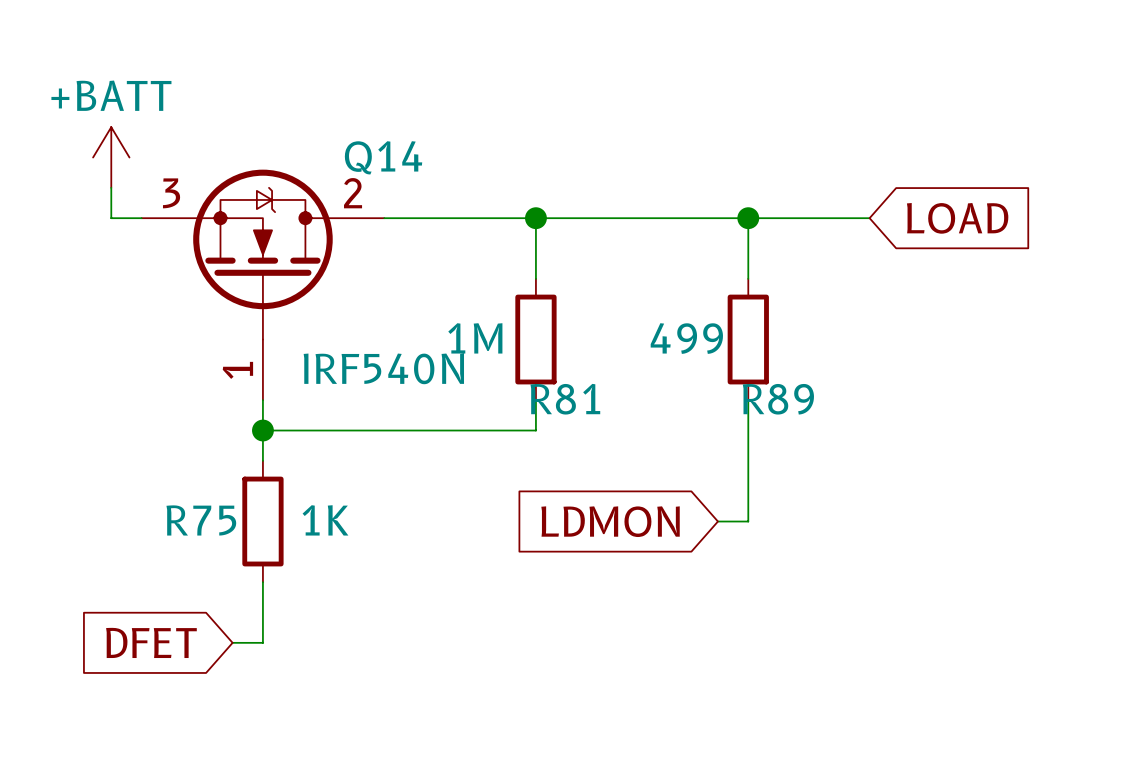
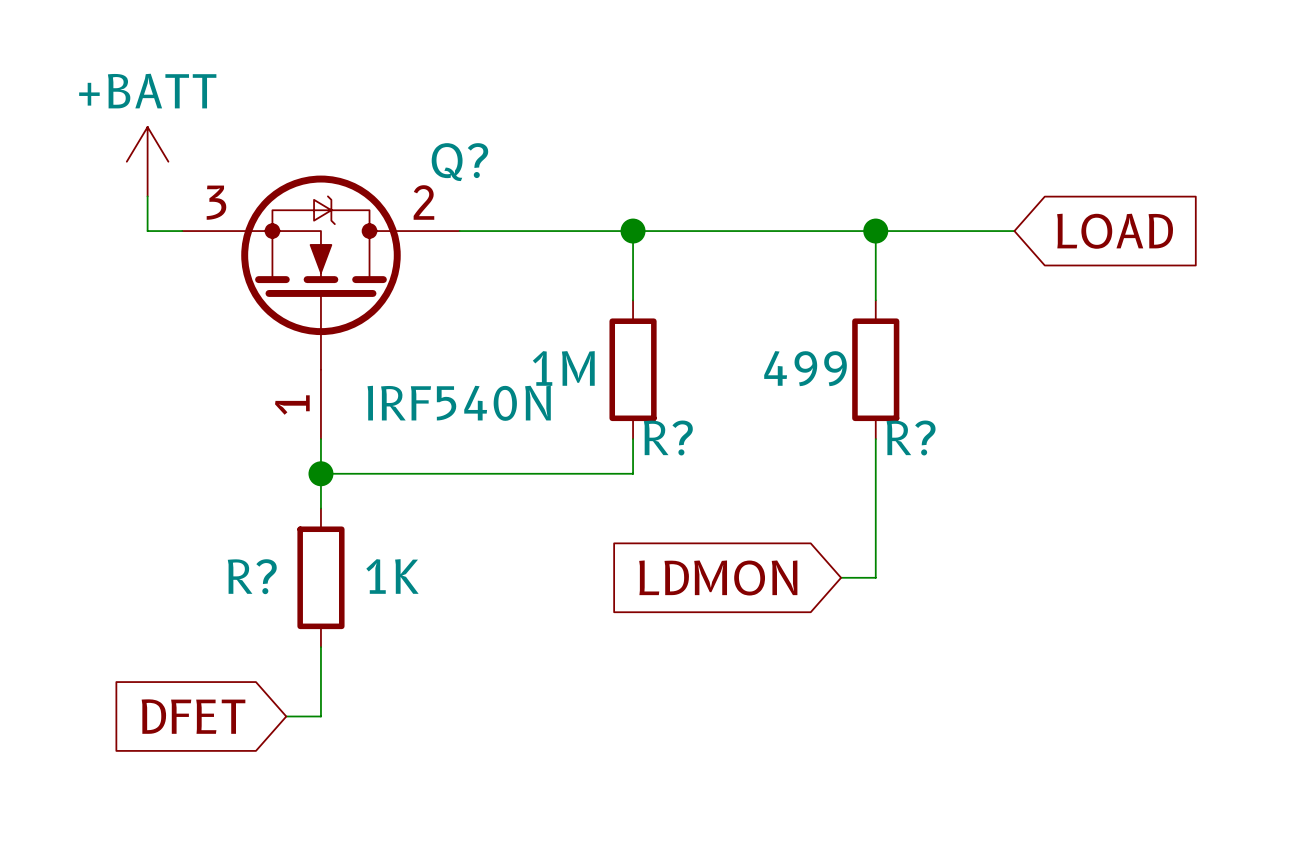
Q14 name: Q14 (383, 157) -> Q? (459, 162)
R81 name: R81 (565, 399) -> R? (668, 437)
R89 name: R89 (778, 399) -> R? (911, 437)
R75 name: R75 (201, 520) -> R? (252, 576)

